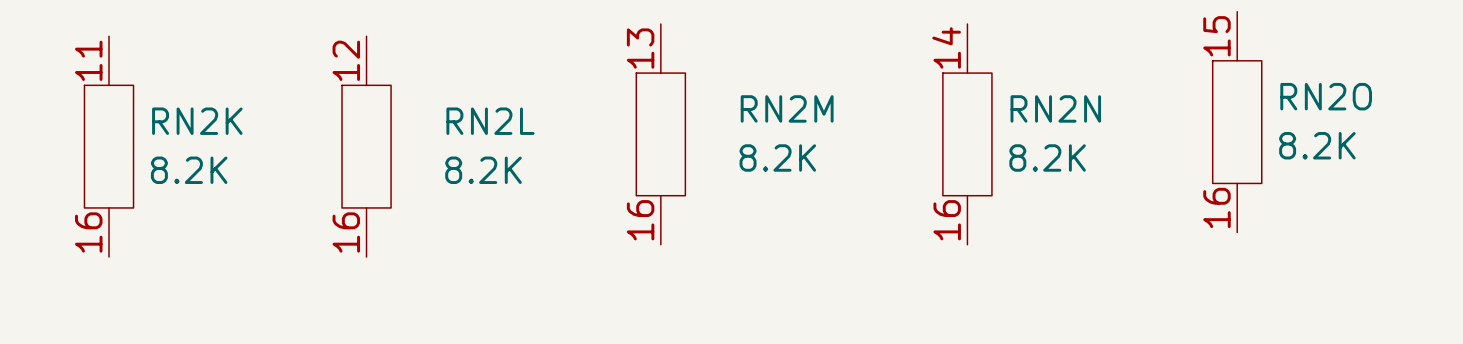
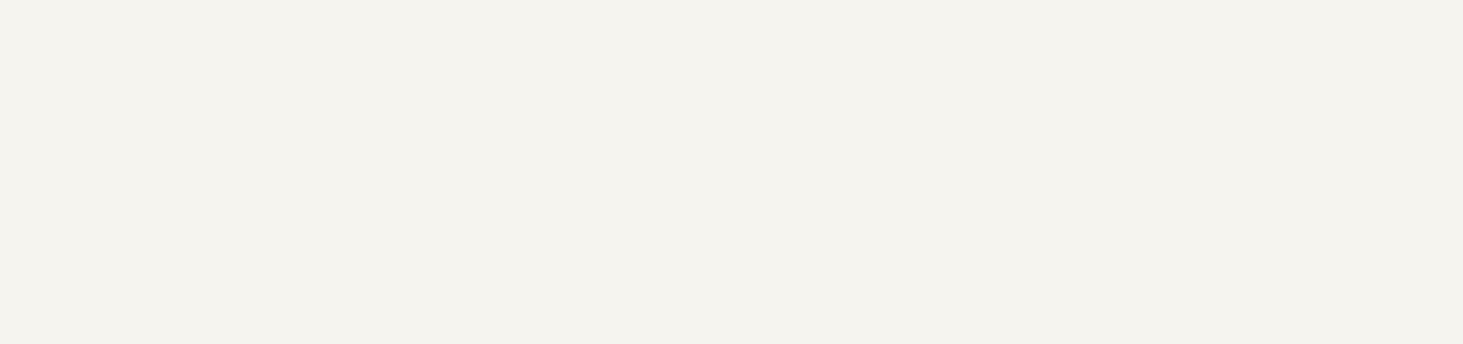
RN2O: 8.2K (1237, 122) -> none
RN2M: 8.2K (660, 134) -> none
RN2N: 8.2K (967, 134) -> none
RN2K: 8.2K (109, 146) -> none
RN2L: 8.2K (366, 146) -> none

